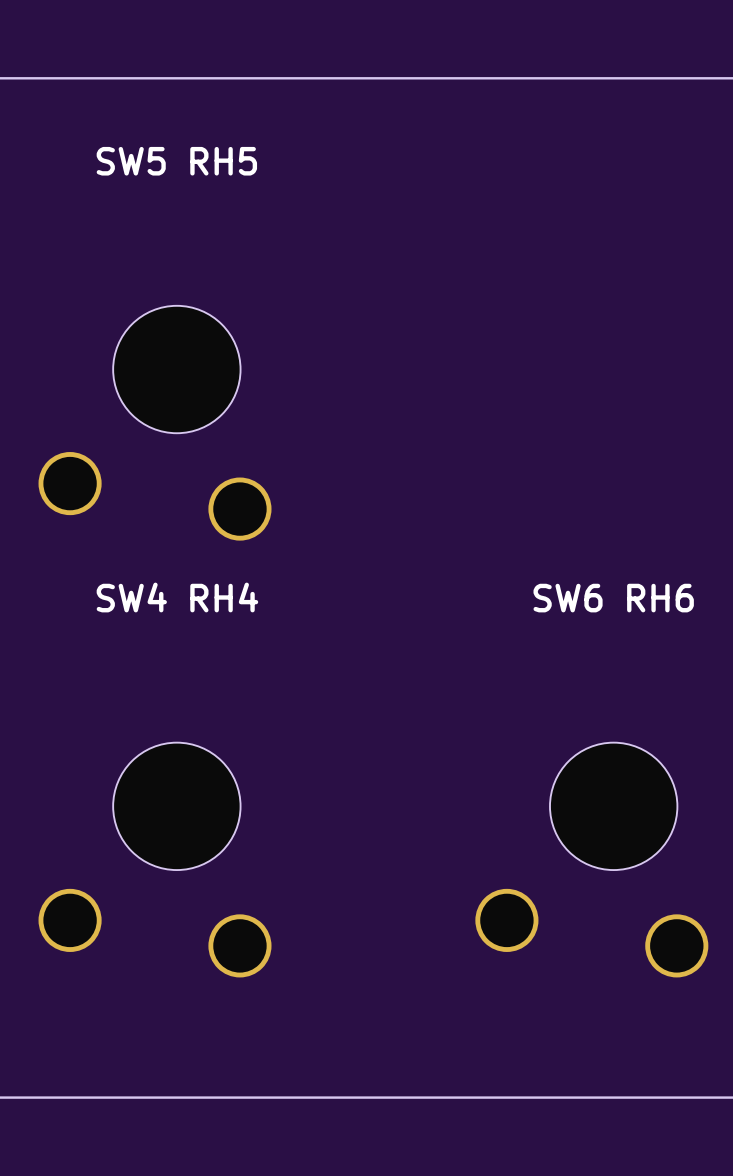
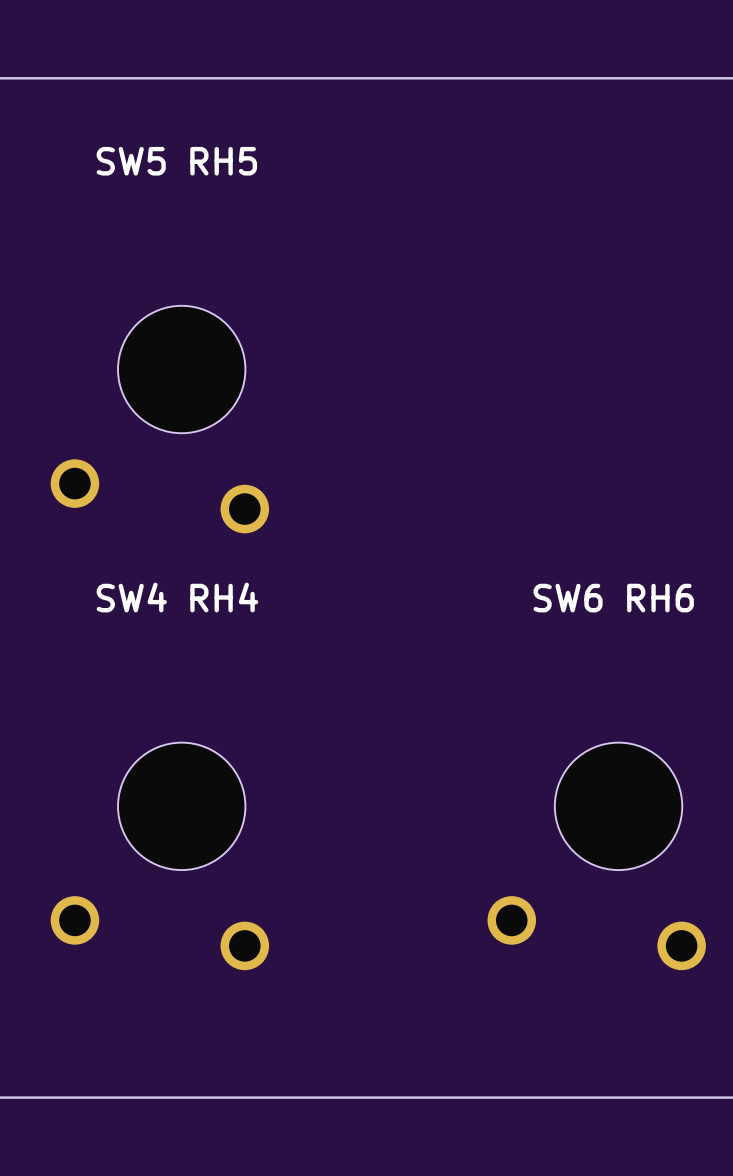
part footprint: [38, 305, 272, 541] -> [50, 305, 270, 534]
part footprint: [38, 742, 272, 978] -> [50, 742, 270, 971]
part footprint: [475, 742, 709, 978] -> [487, 742, 706, 971]

